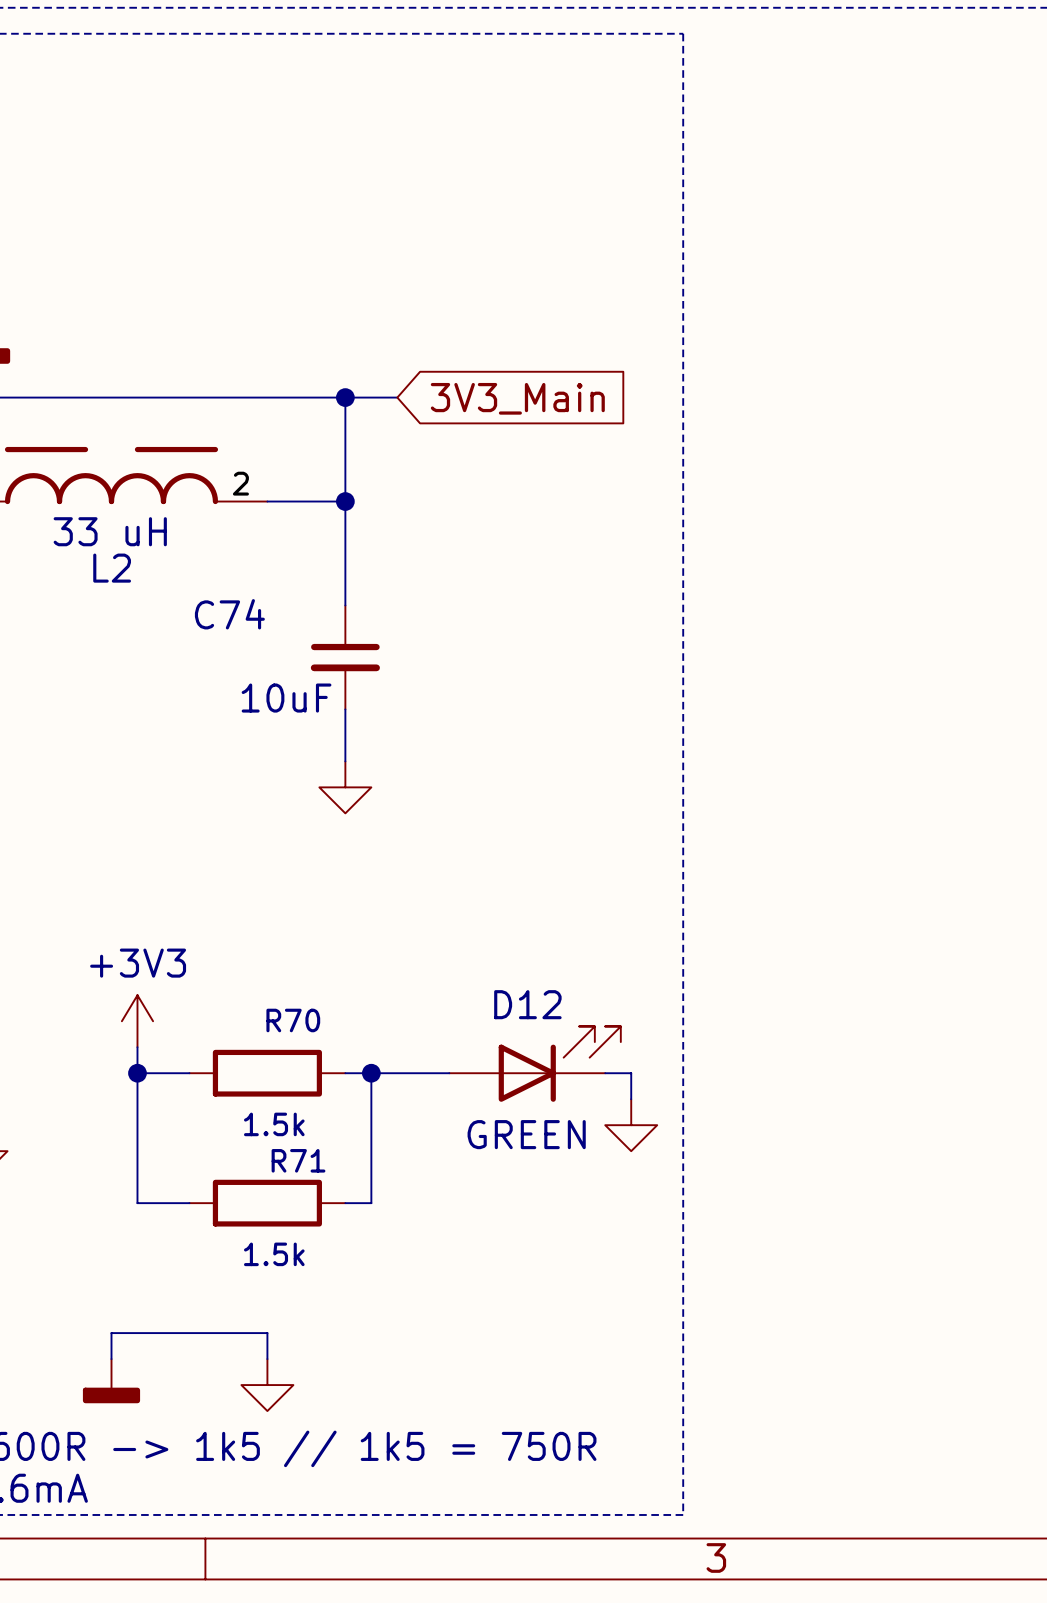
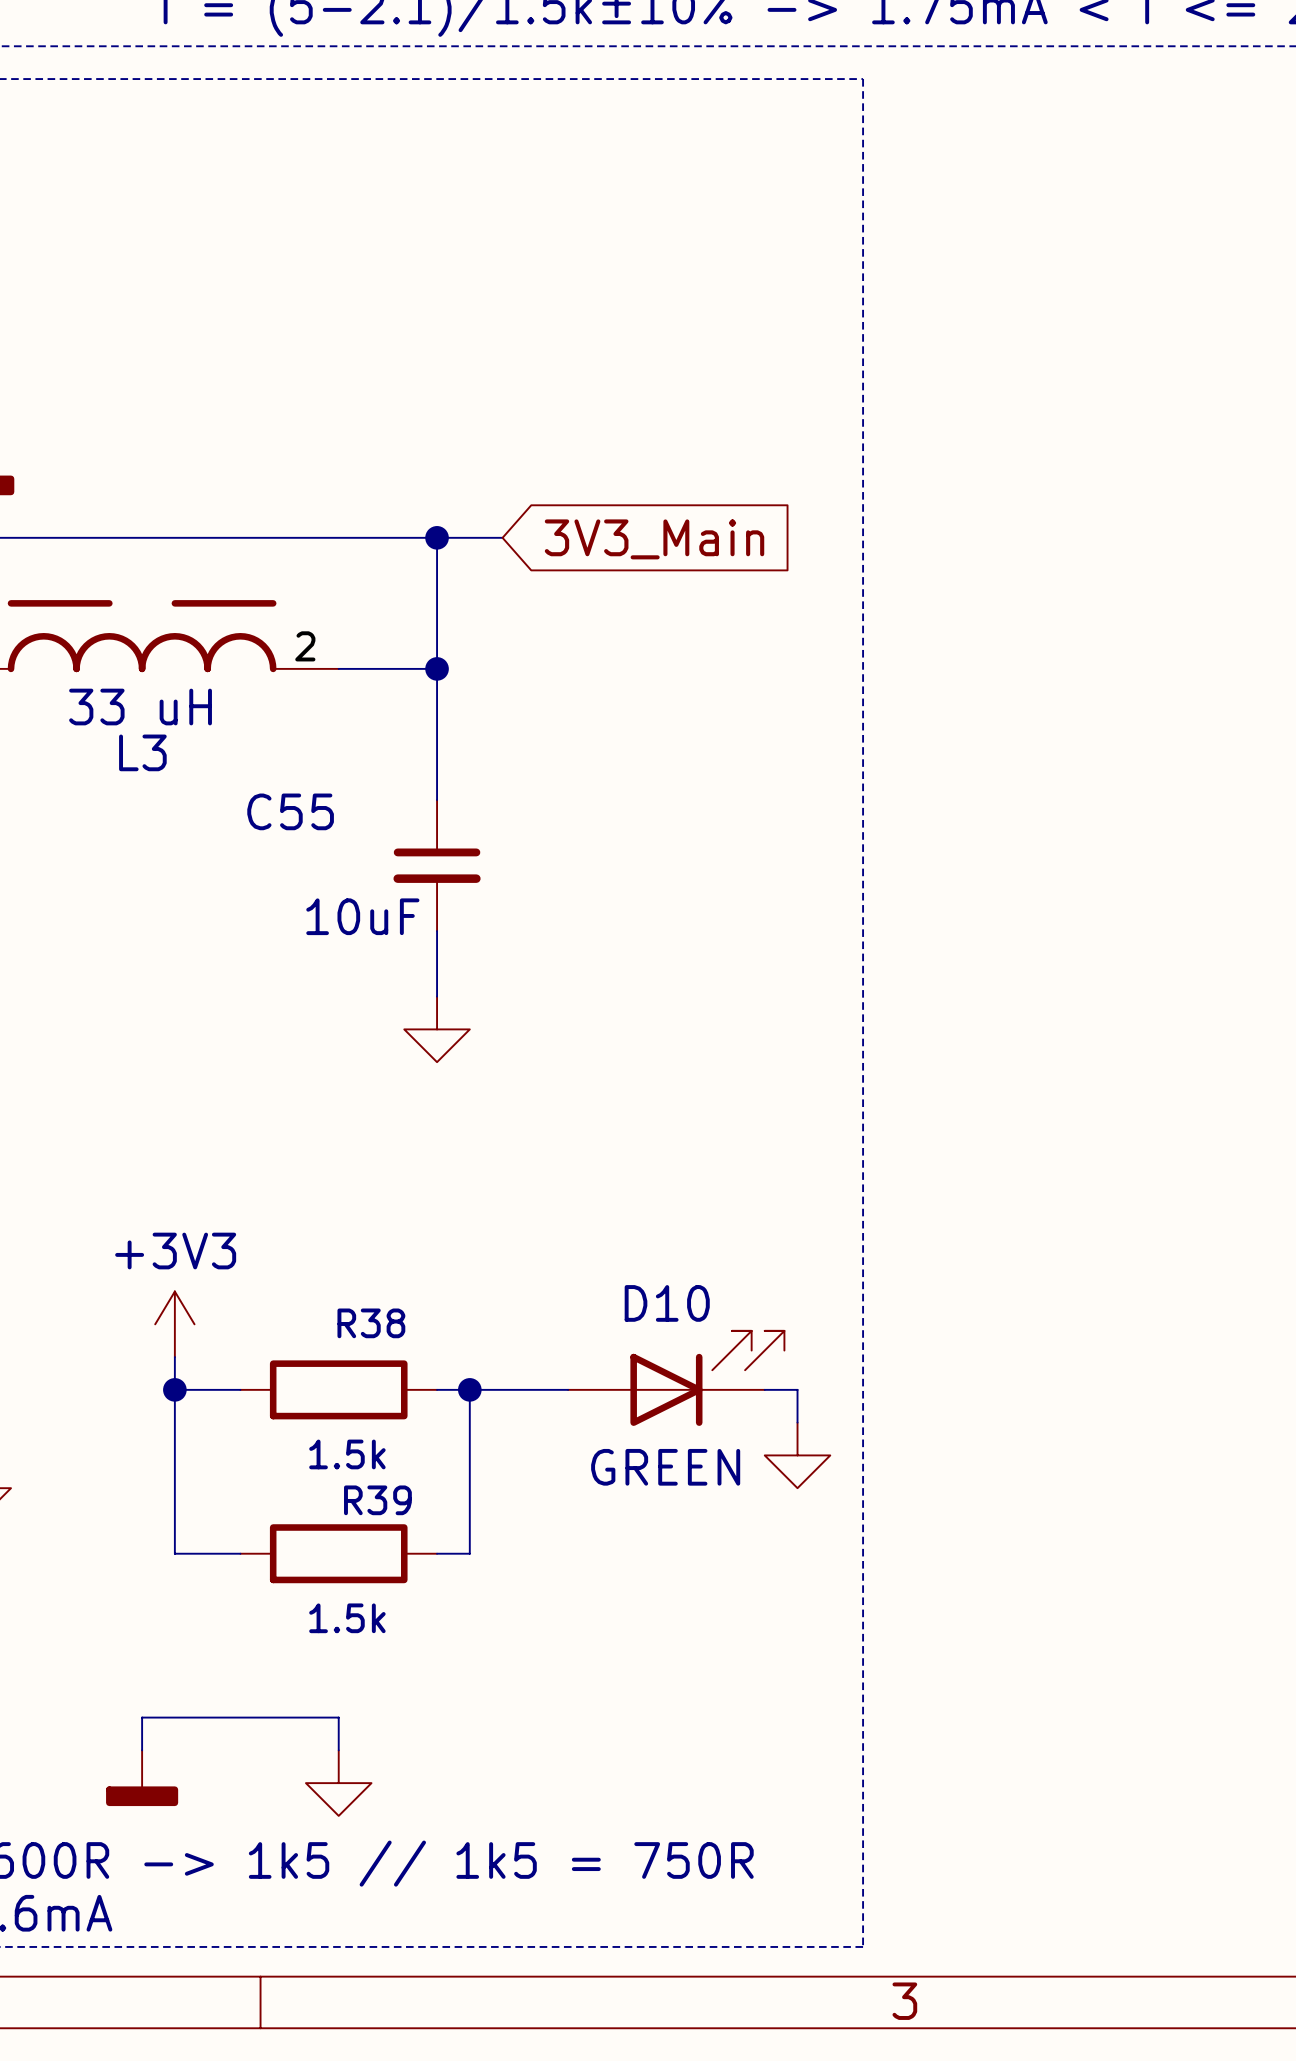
L2 name: L2 (112, 568) -> L3 (142, 752)
C74 name: C74 (229, 614) -> C55 (290, 811)
D12 name: D12 (527, 1004) -> D10 (667, 1303)
R70 name: R70 (293, 1020) -> R38 (371, 1323)
R71 name: R71 (298, 1160) -> R39 (377, 1500)

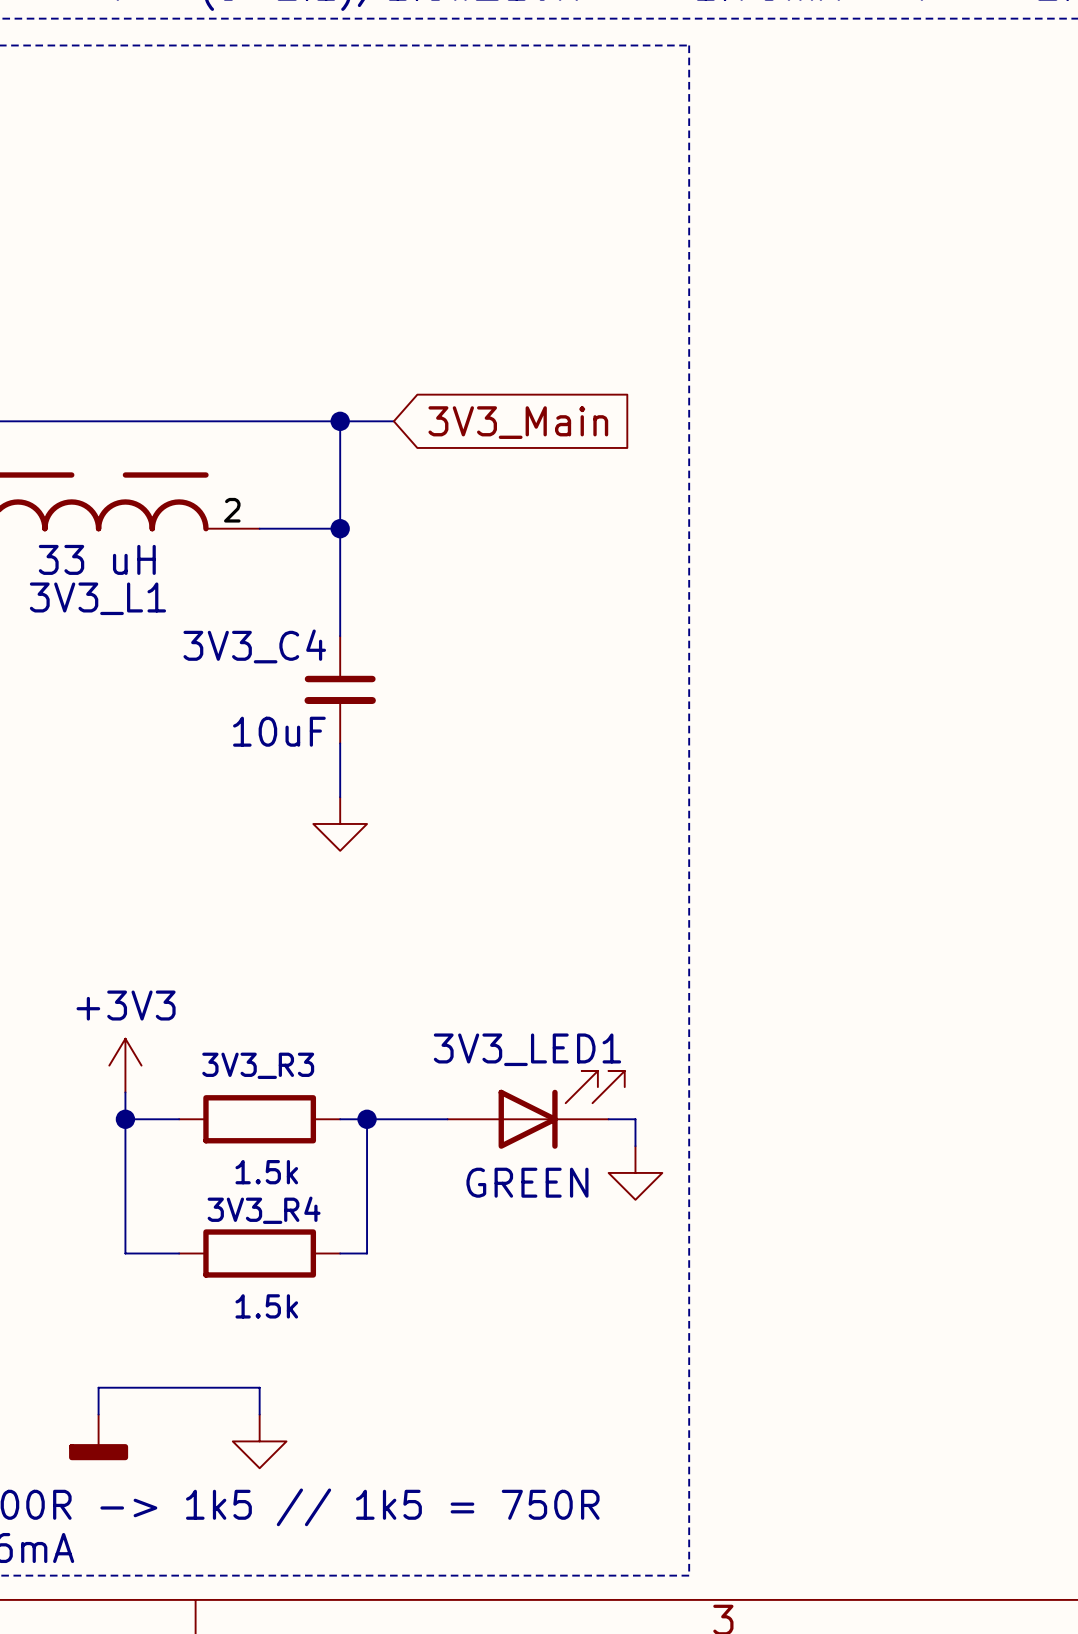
L3 name: L3 (142, 752) -> 3V3_L1 (97, 598)
C55 name: C55 (290, 811) -> 3V3_C4 (254, 646)
D10 name: D10 (667, 1303) -> 3V3_LED1 (527, 1049)
R38 name: R38 (371, 1323) -> 3V3_R3 (258, 1065)
R39 name: R39 (377, 1500) -> 3V3_R4 (264, 1210)

